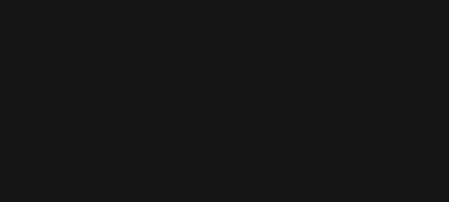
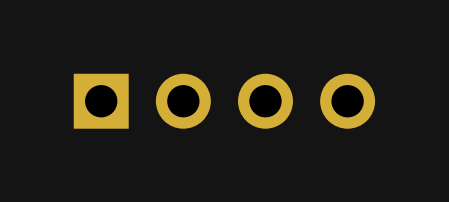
part: none -> (224, 101)

